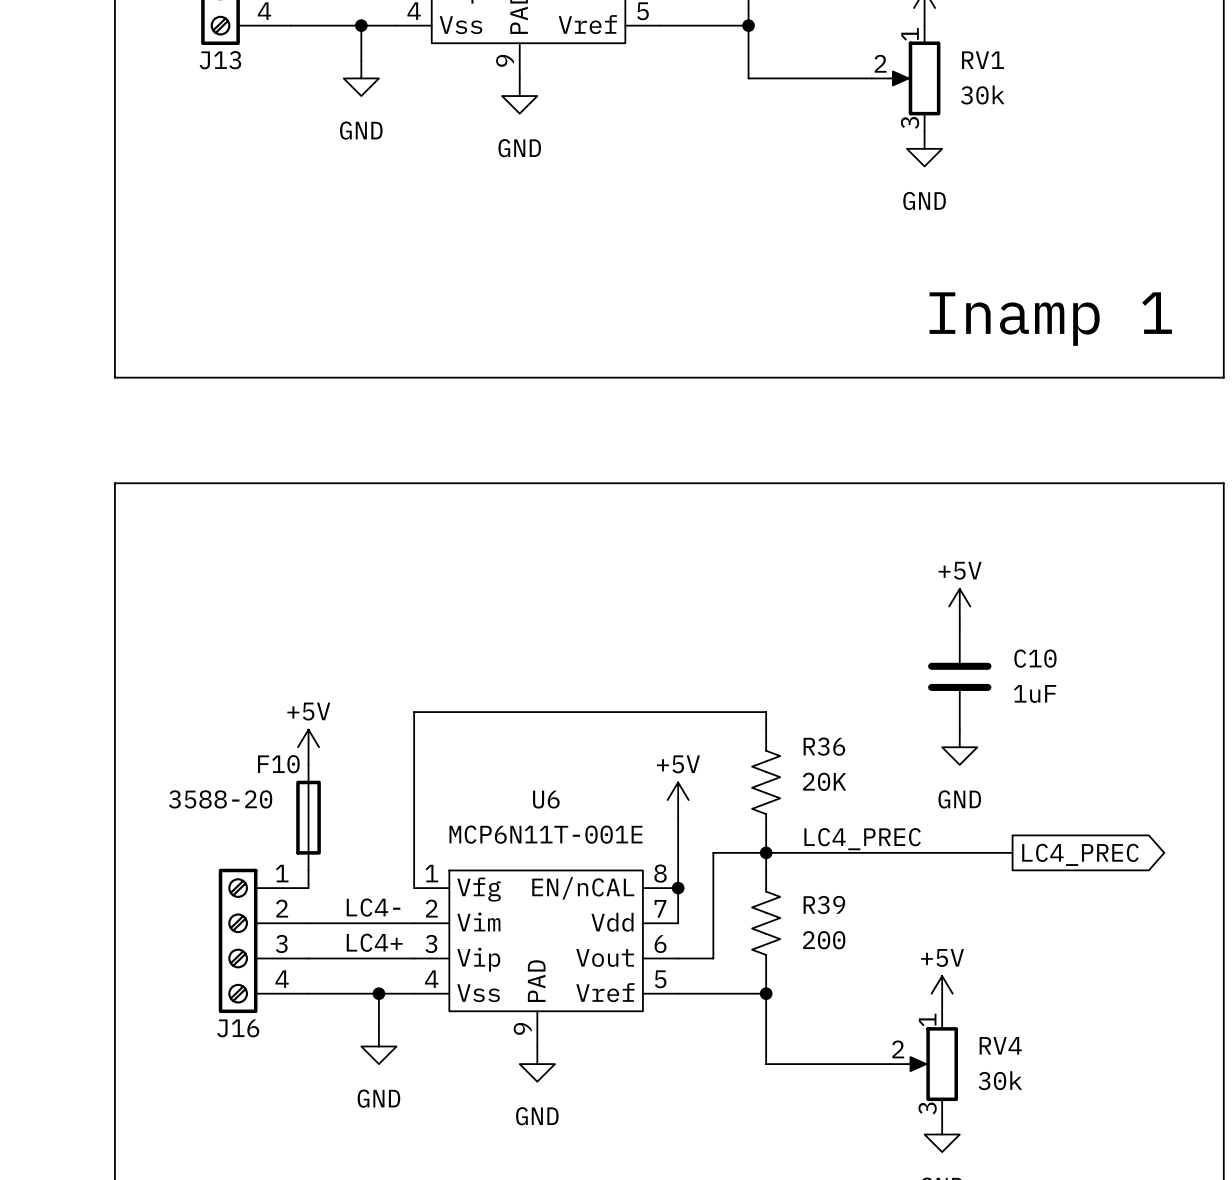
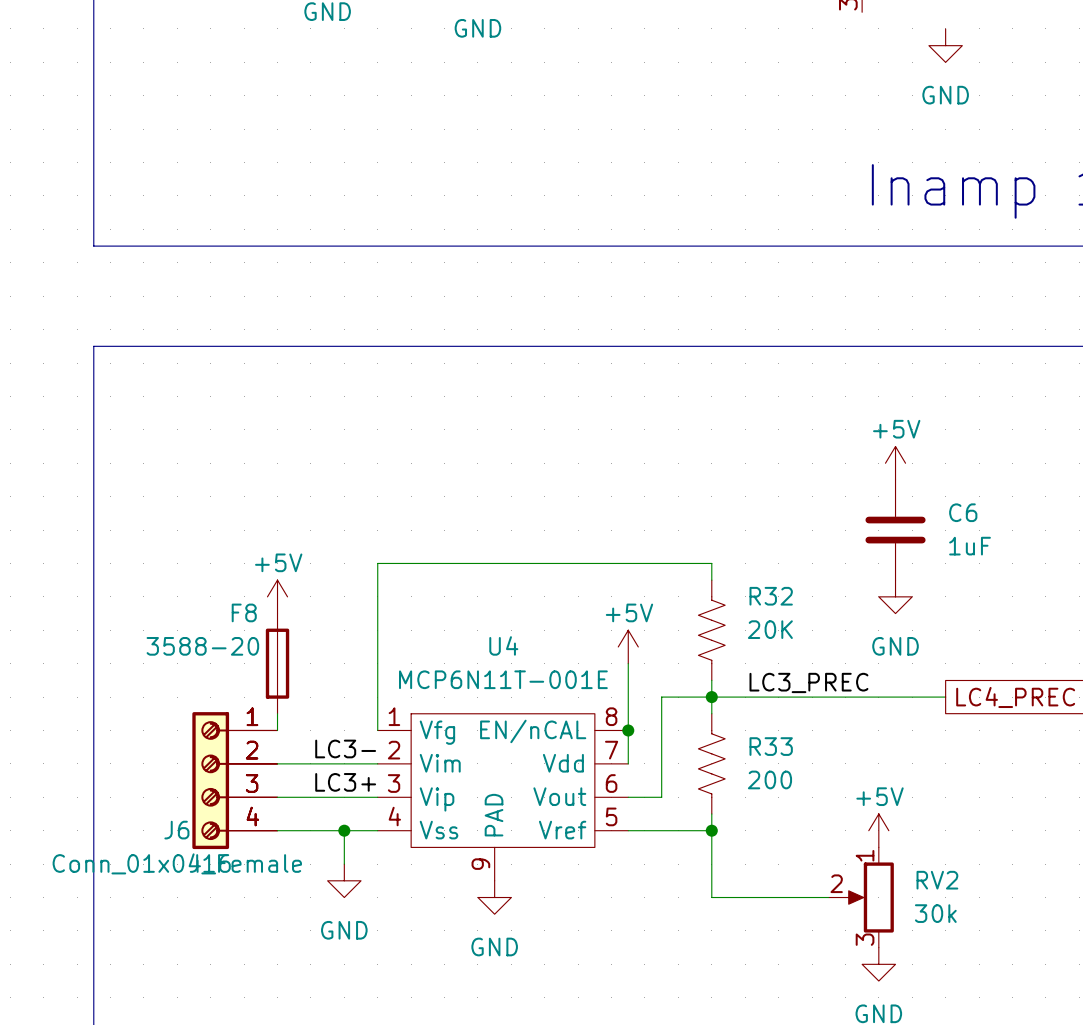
power symbol position: GND (924, 148) -> GND (945, 45)
C10 name: C10 (1035, 658) -> C6 (963, 512)
R36 name: R36 (824, 746) -> R32 (771, 596)
F10 name: F10 (278, 764) -> F8 (244, 612)
U6 name: U6 (546, 799) -> U4 (503, 645)
label: LC4_PREC (862, 839) -> LC3_PREC (808, 682)
R39 name: R39 (824, 905) -> R33 (771, 746)
label: LC4- (373, 907) -> LC3- (345, 748)
J6: none -> Conn_01x04_Female (243, 780)
label: LC4+ (374, 942) -> LC3+ (345, 782)
RV4 name: RV4 (1000, 1045) -> RV2 (937, 880)

